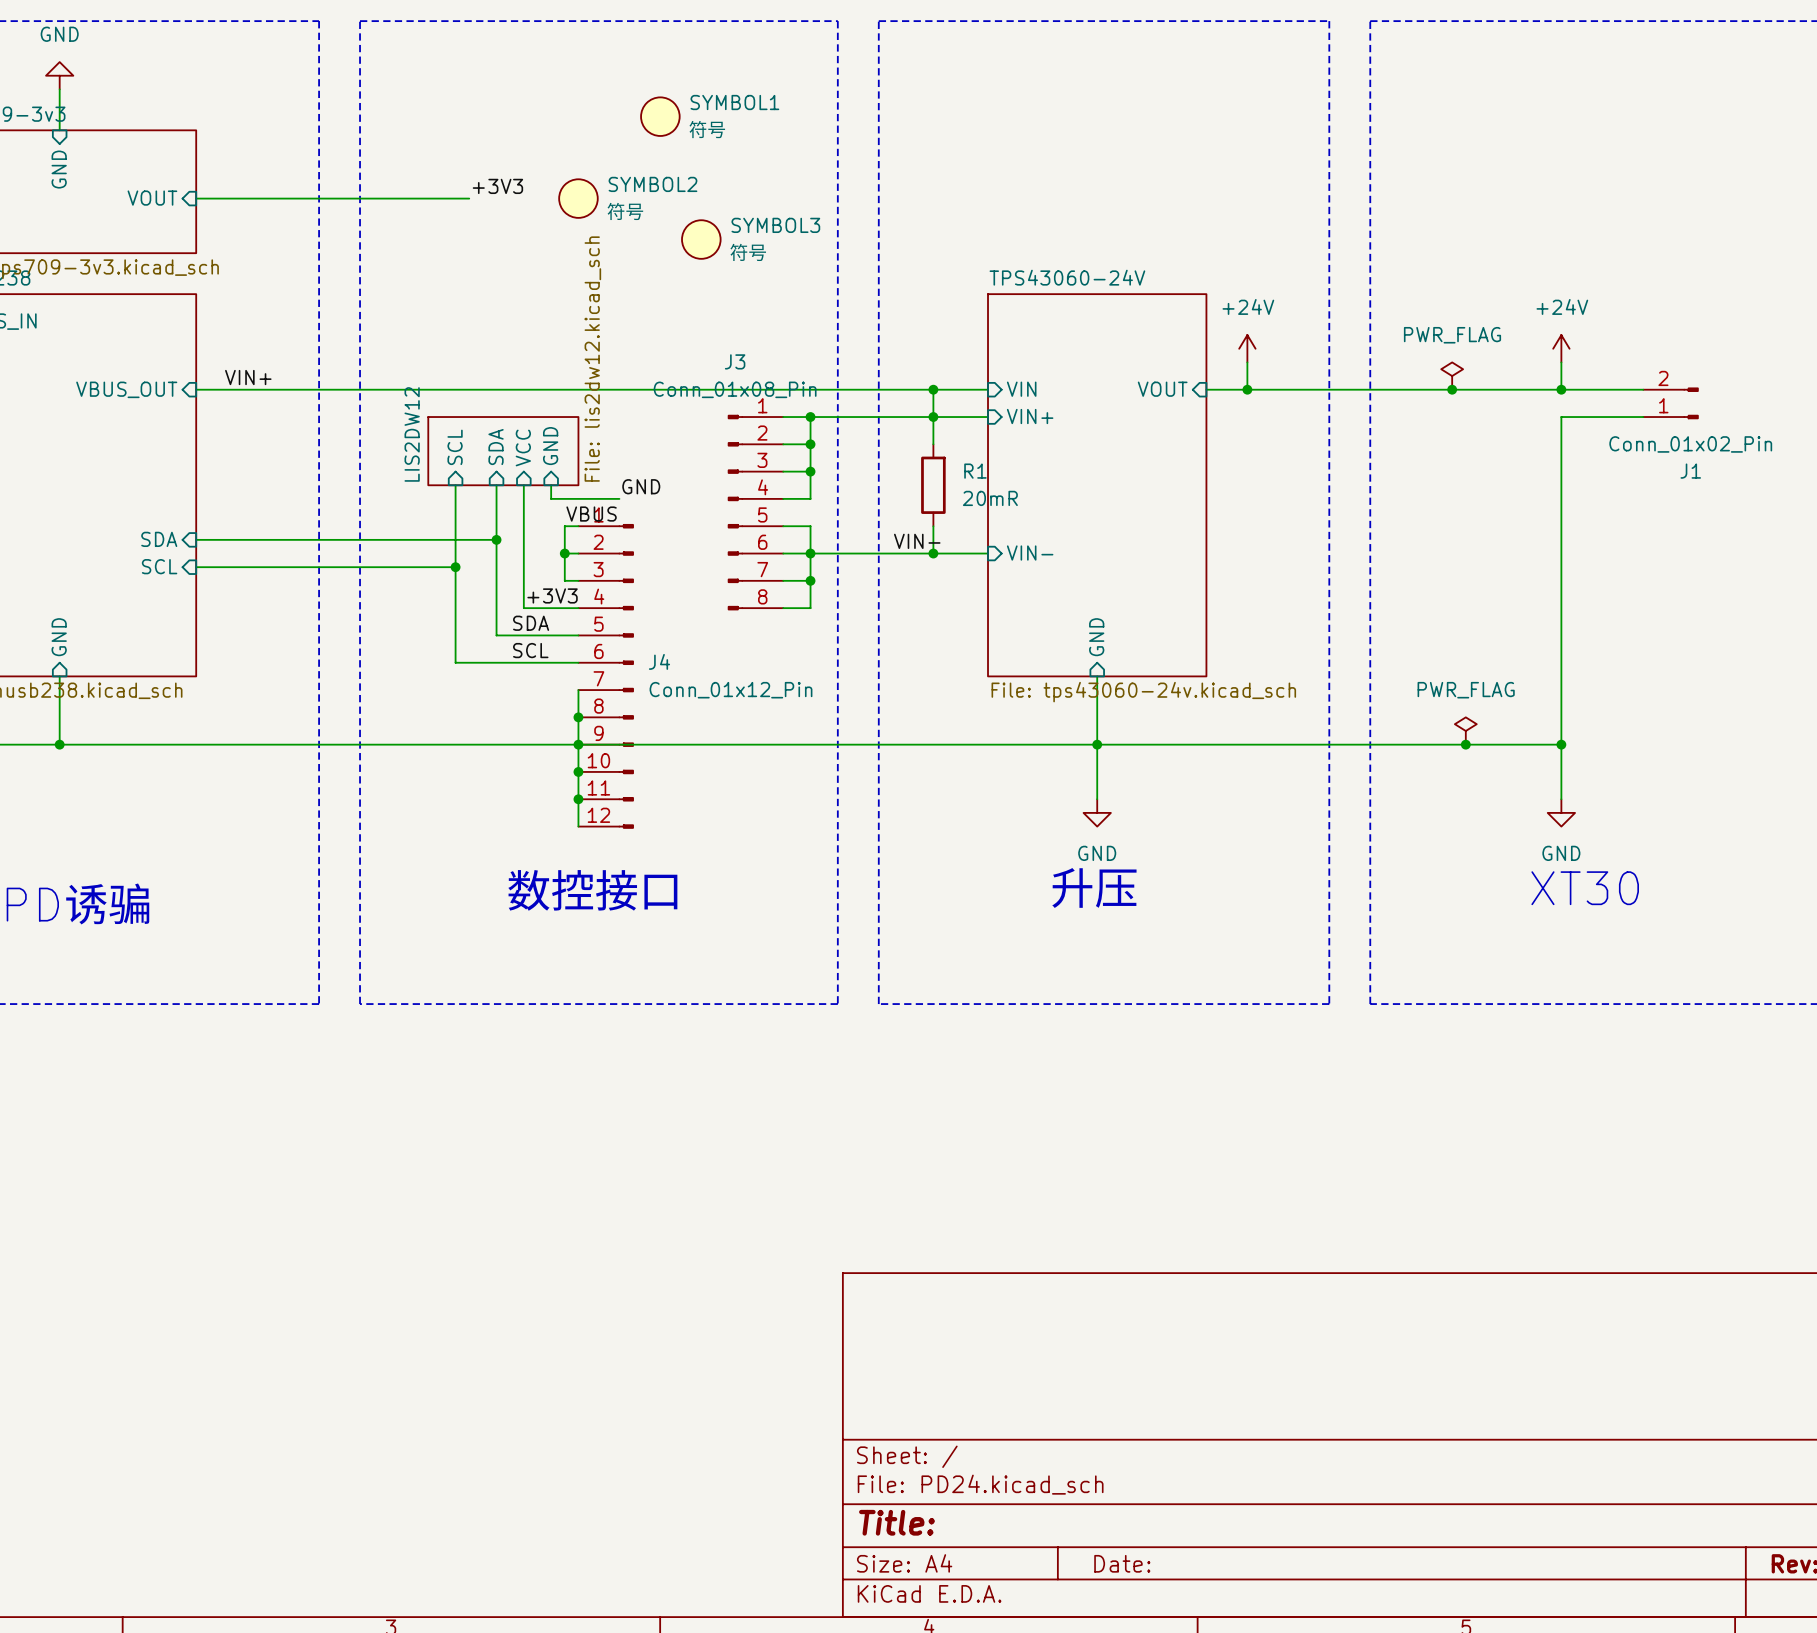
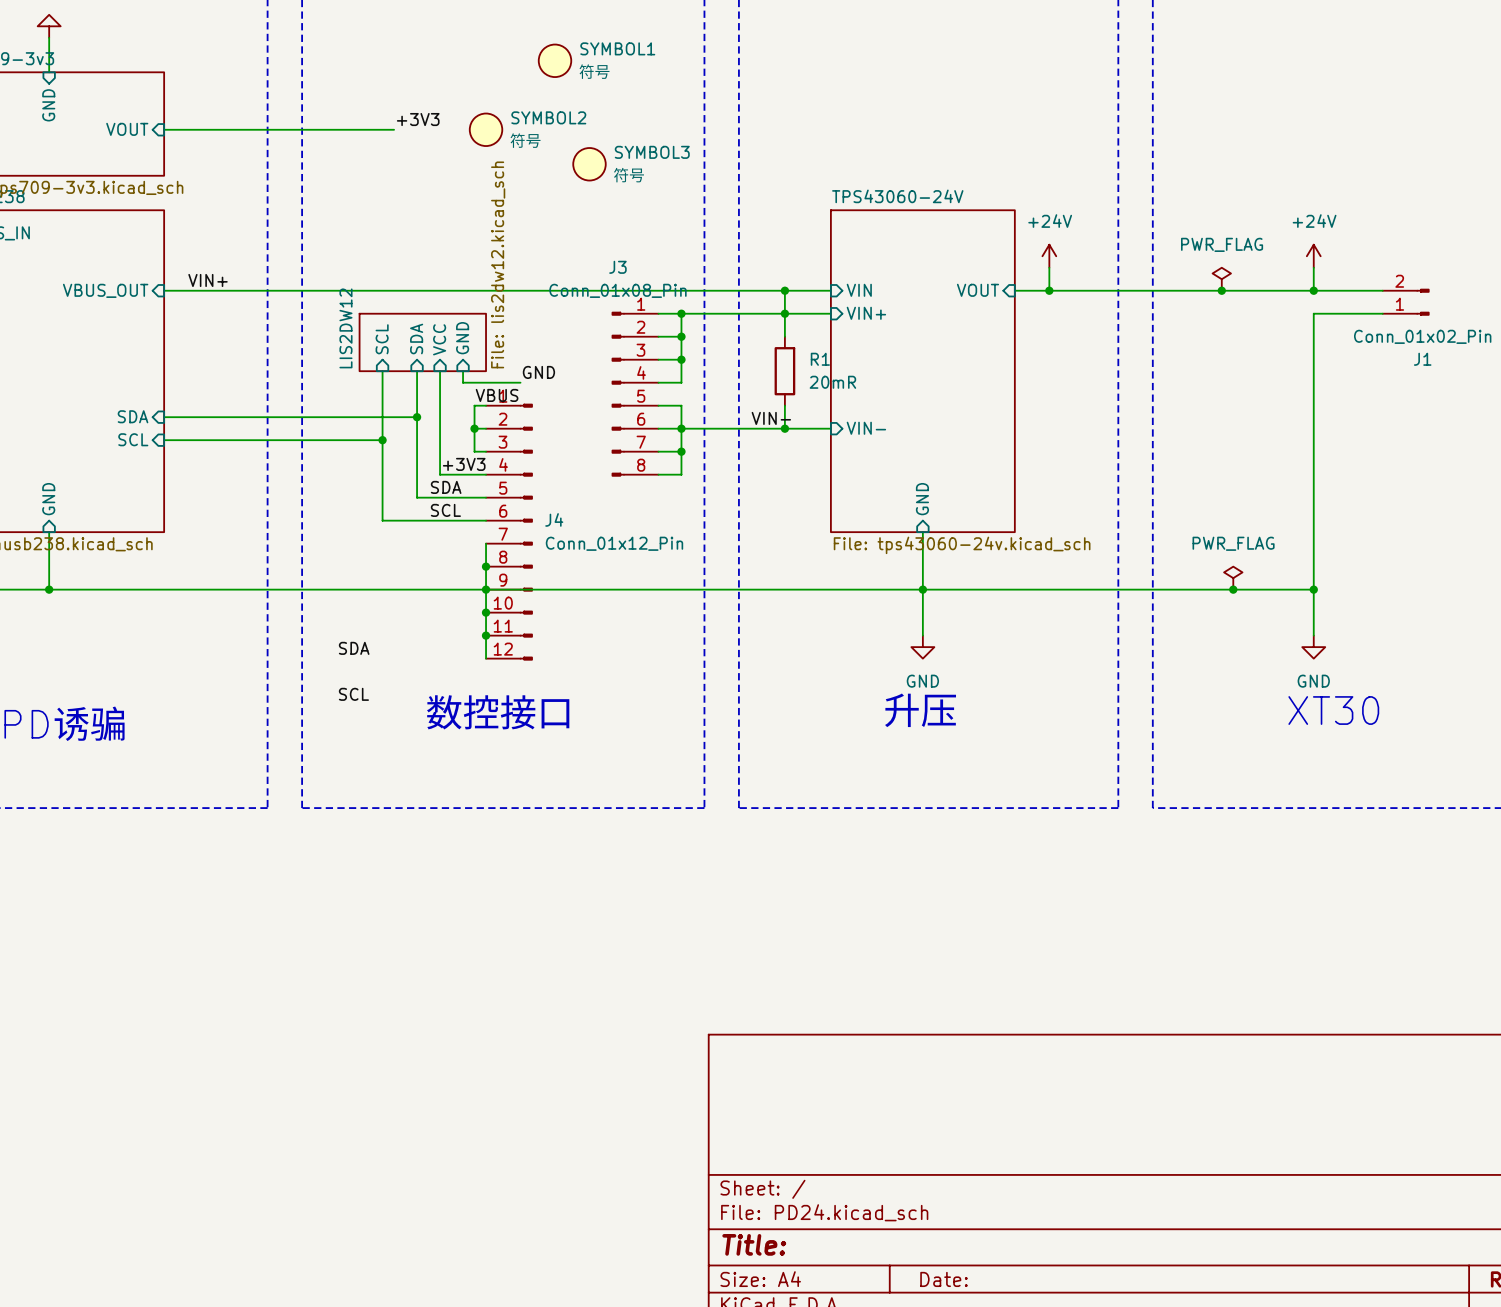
label: none -> SDA (354, 648)
label: none -> SCL (353, 694)

